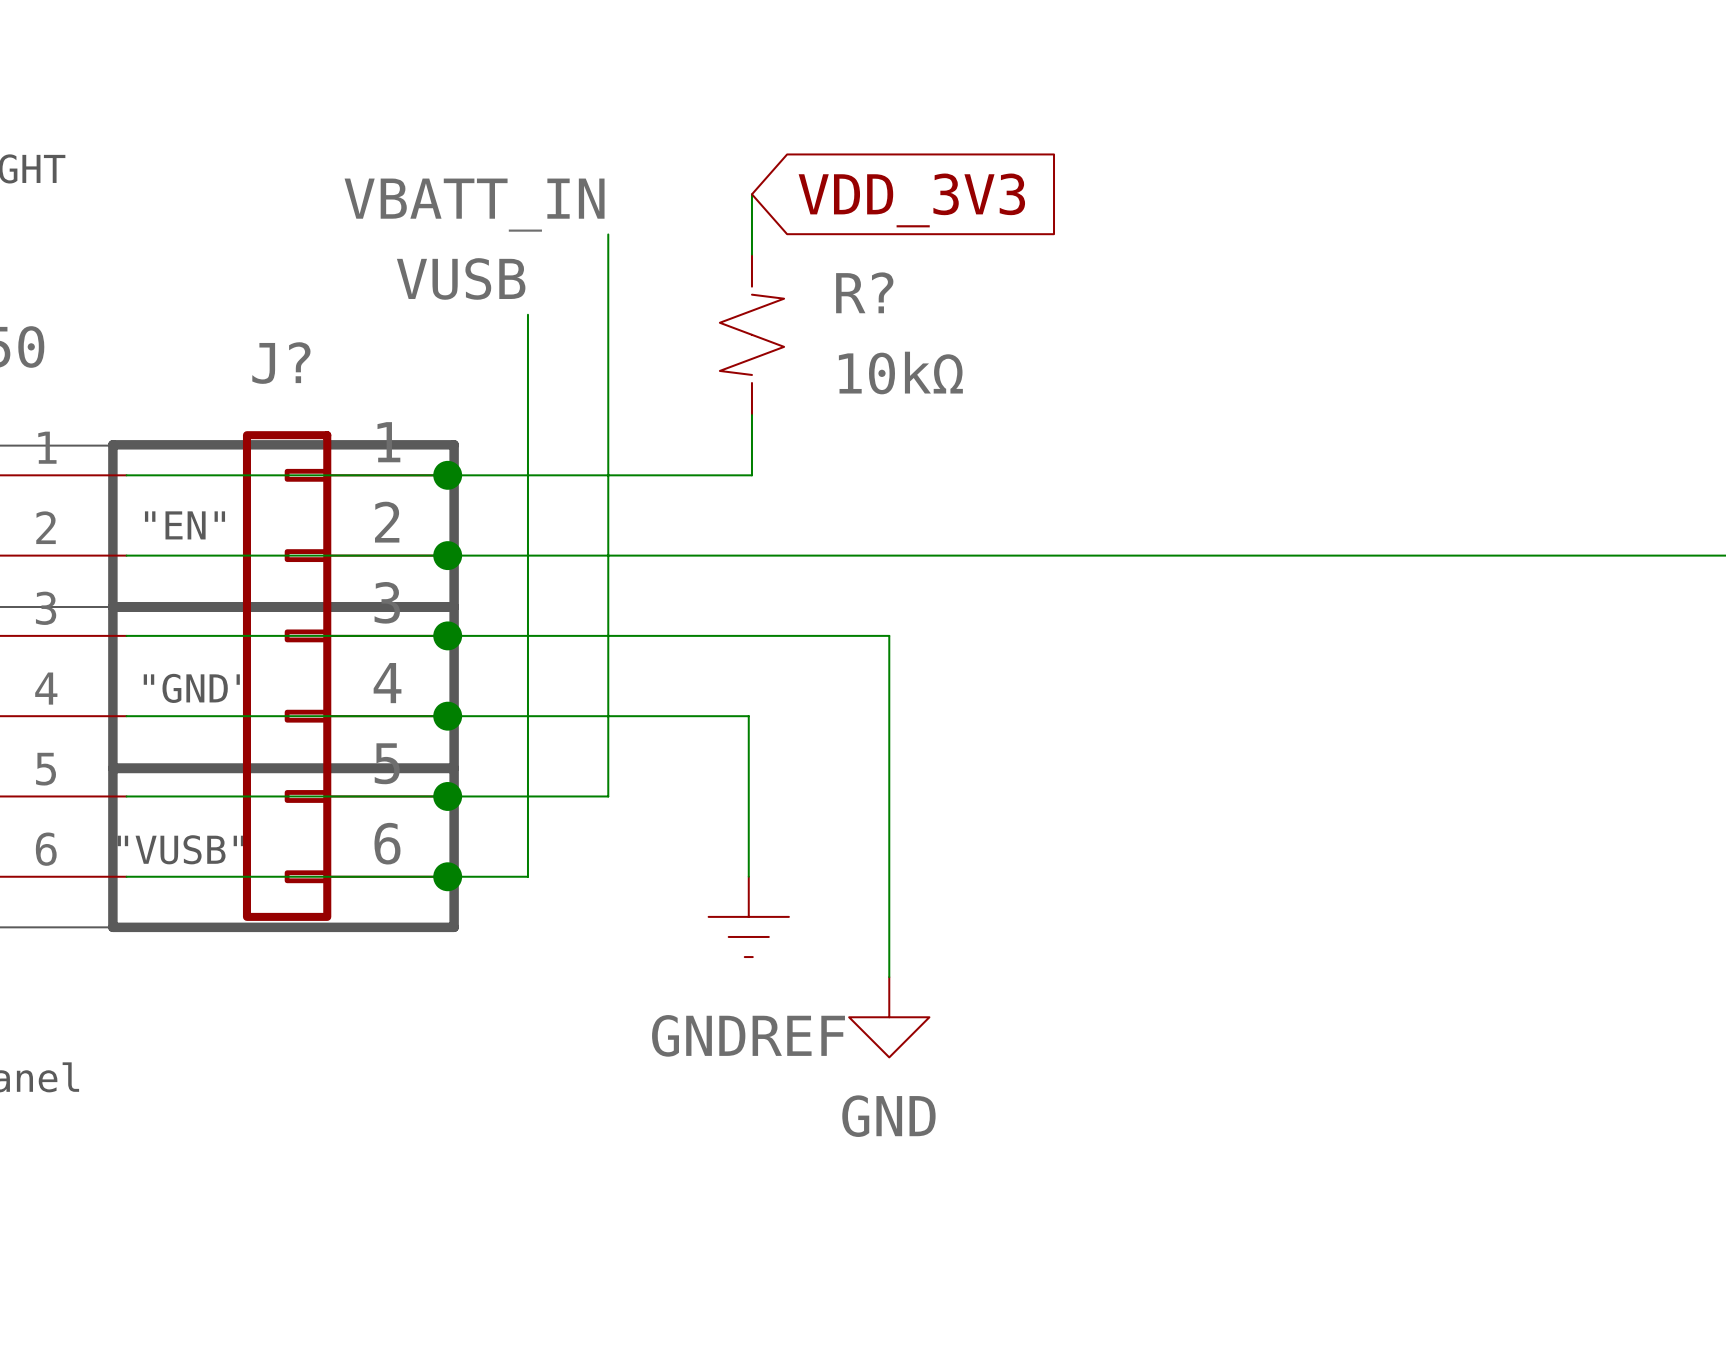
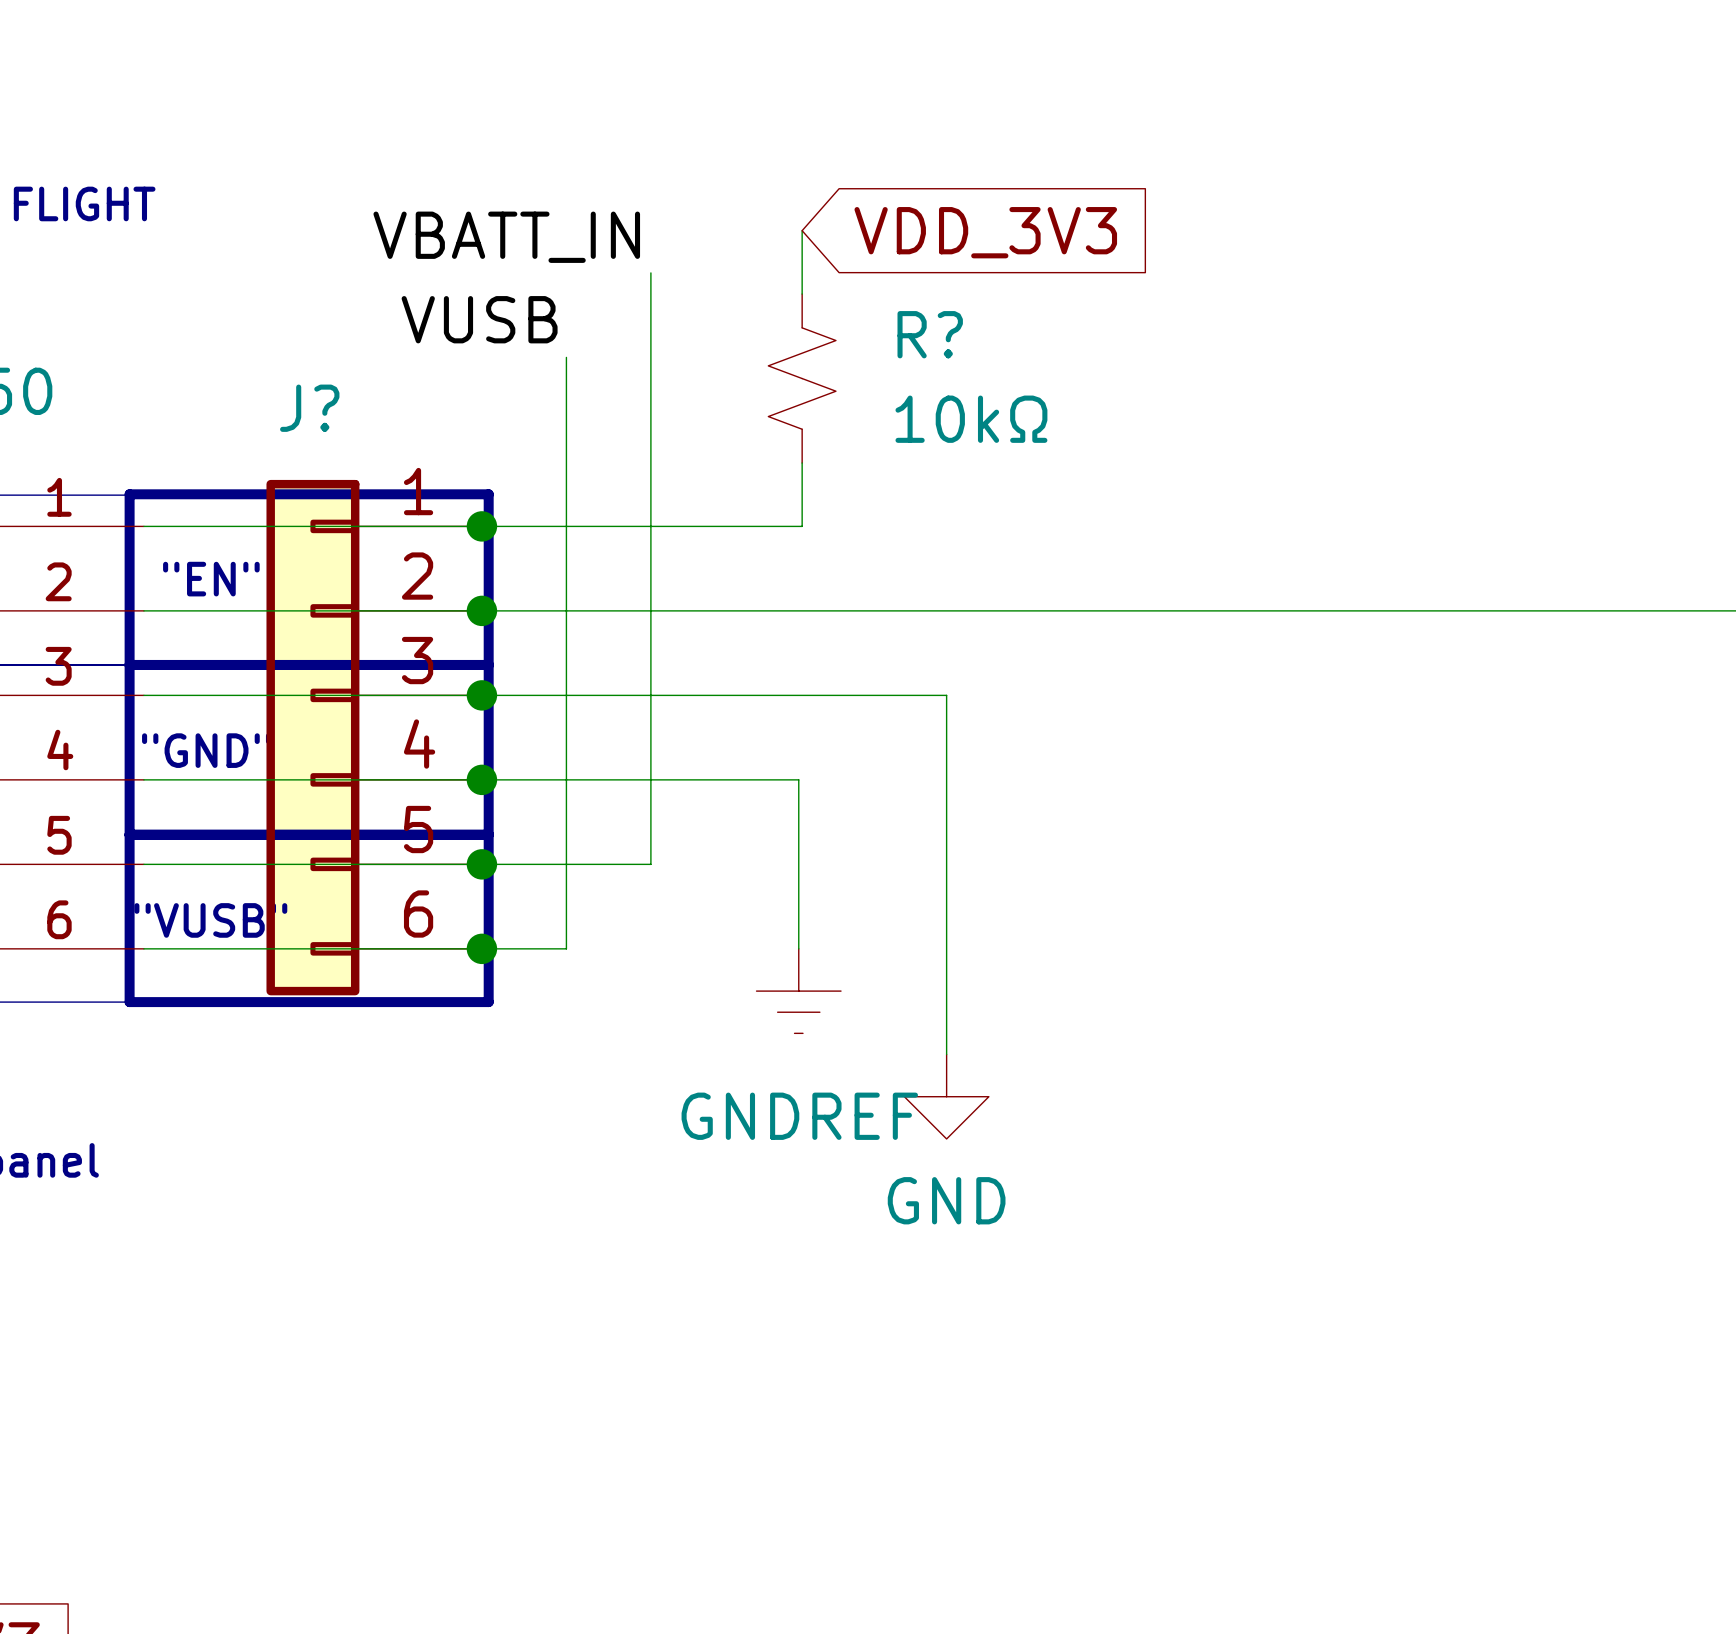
R? symbol: [719, 254, 785, 416] -> [768, 294, 836, 464]

